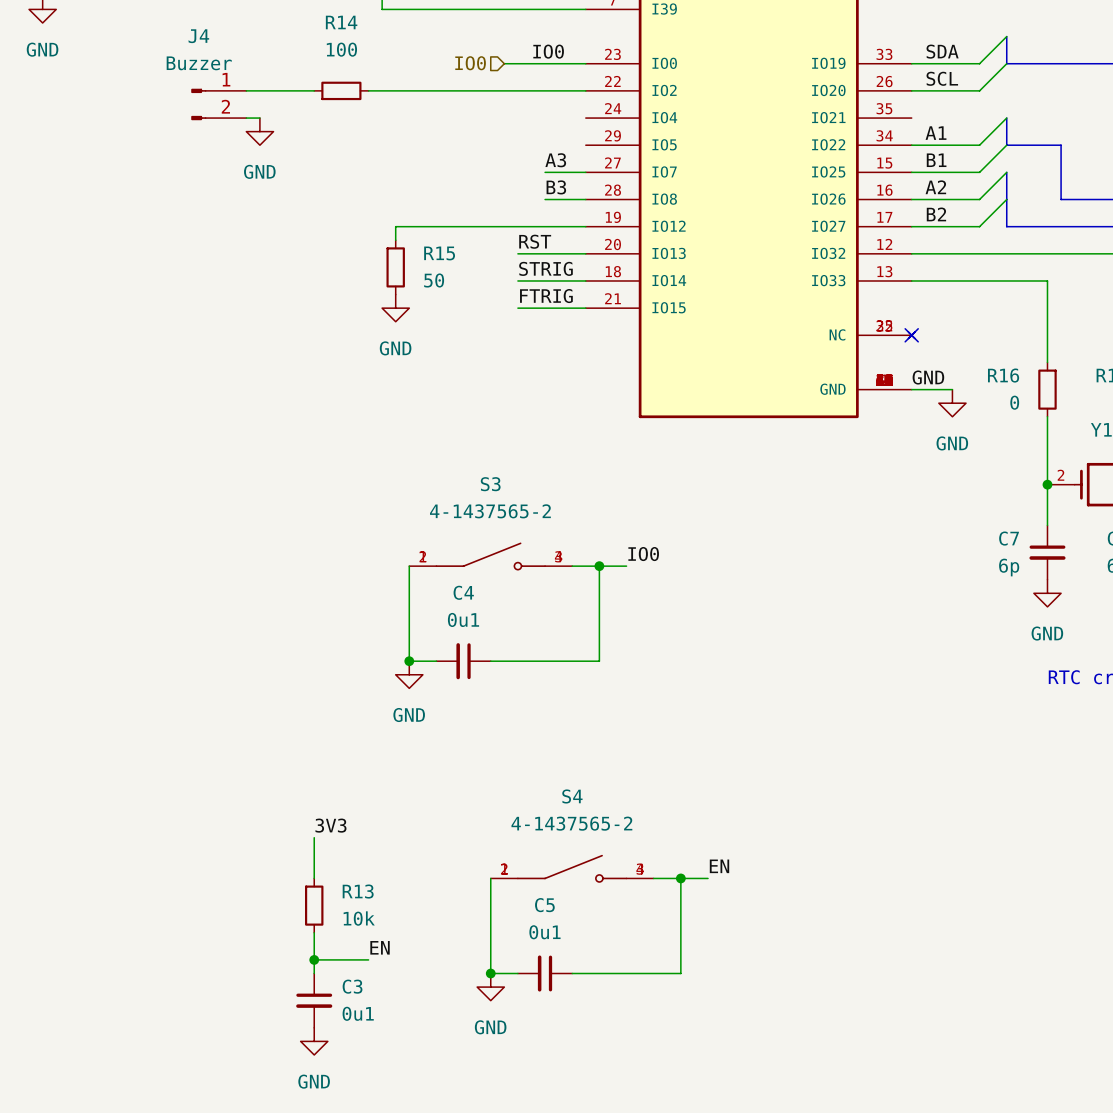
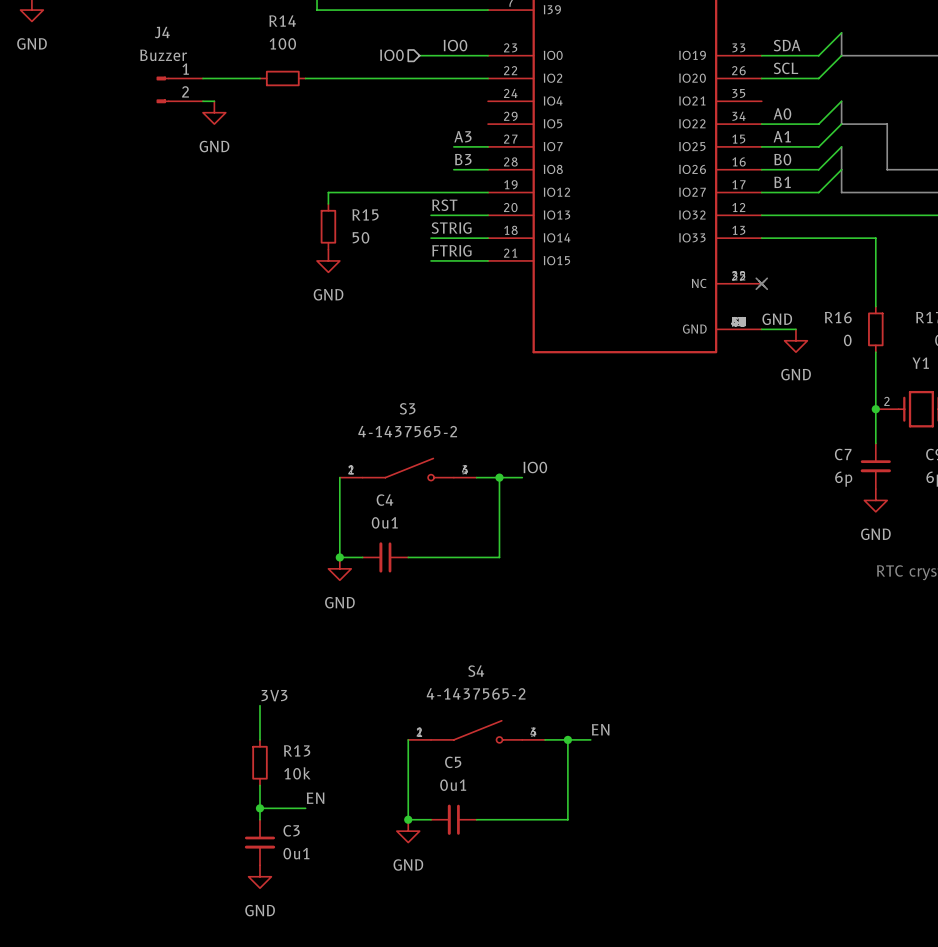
label: A1 (936, 133) -> A0 (782, 113)
label: B1 (936, 160) -> A1 (782, 136)
label: A2 (935, 187) -> B0 (782, 159)
label: B2 (936, 214) -> B1 (782, 182)

